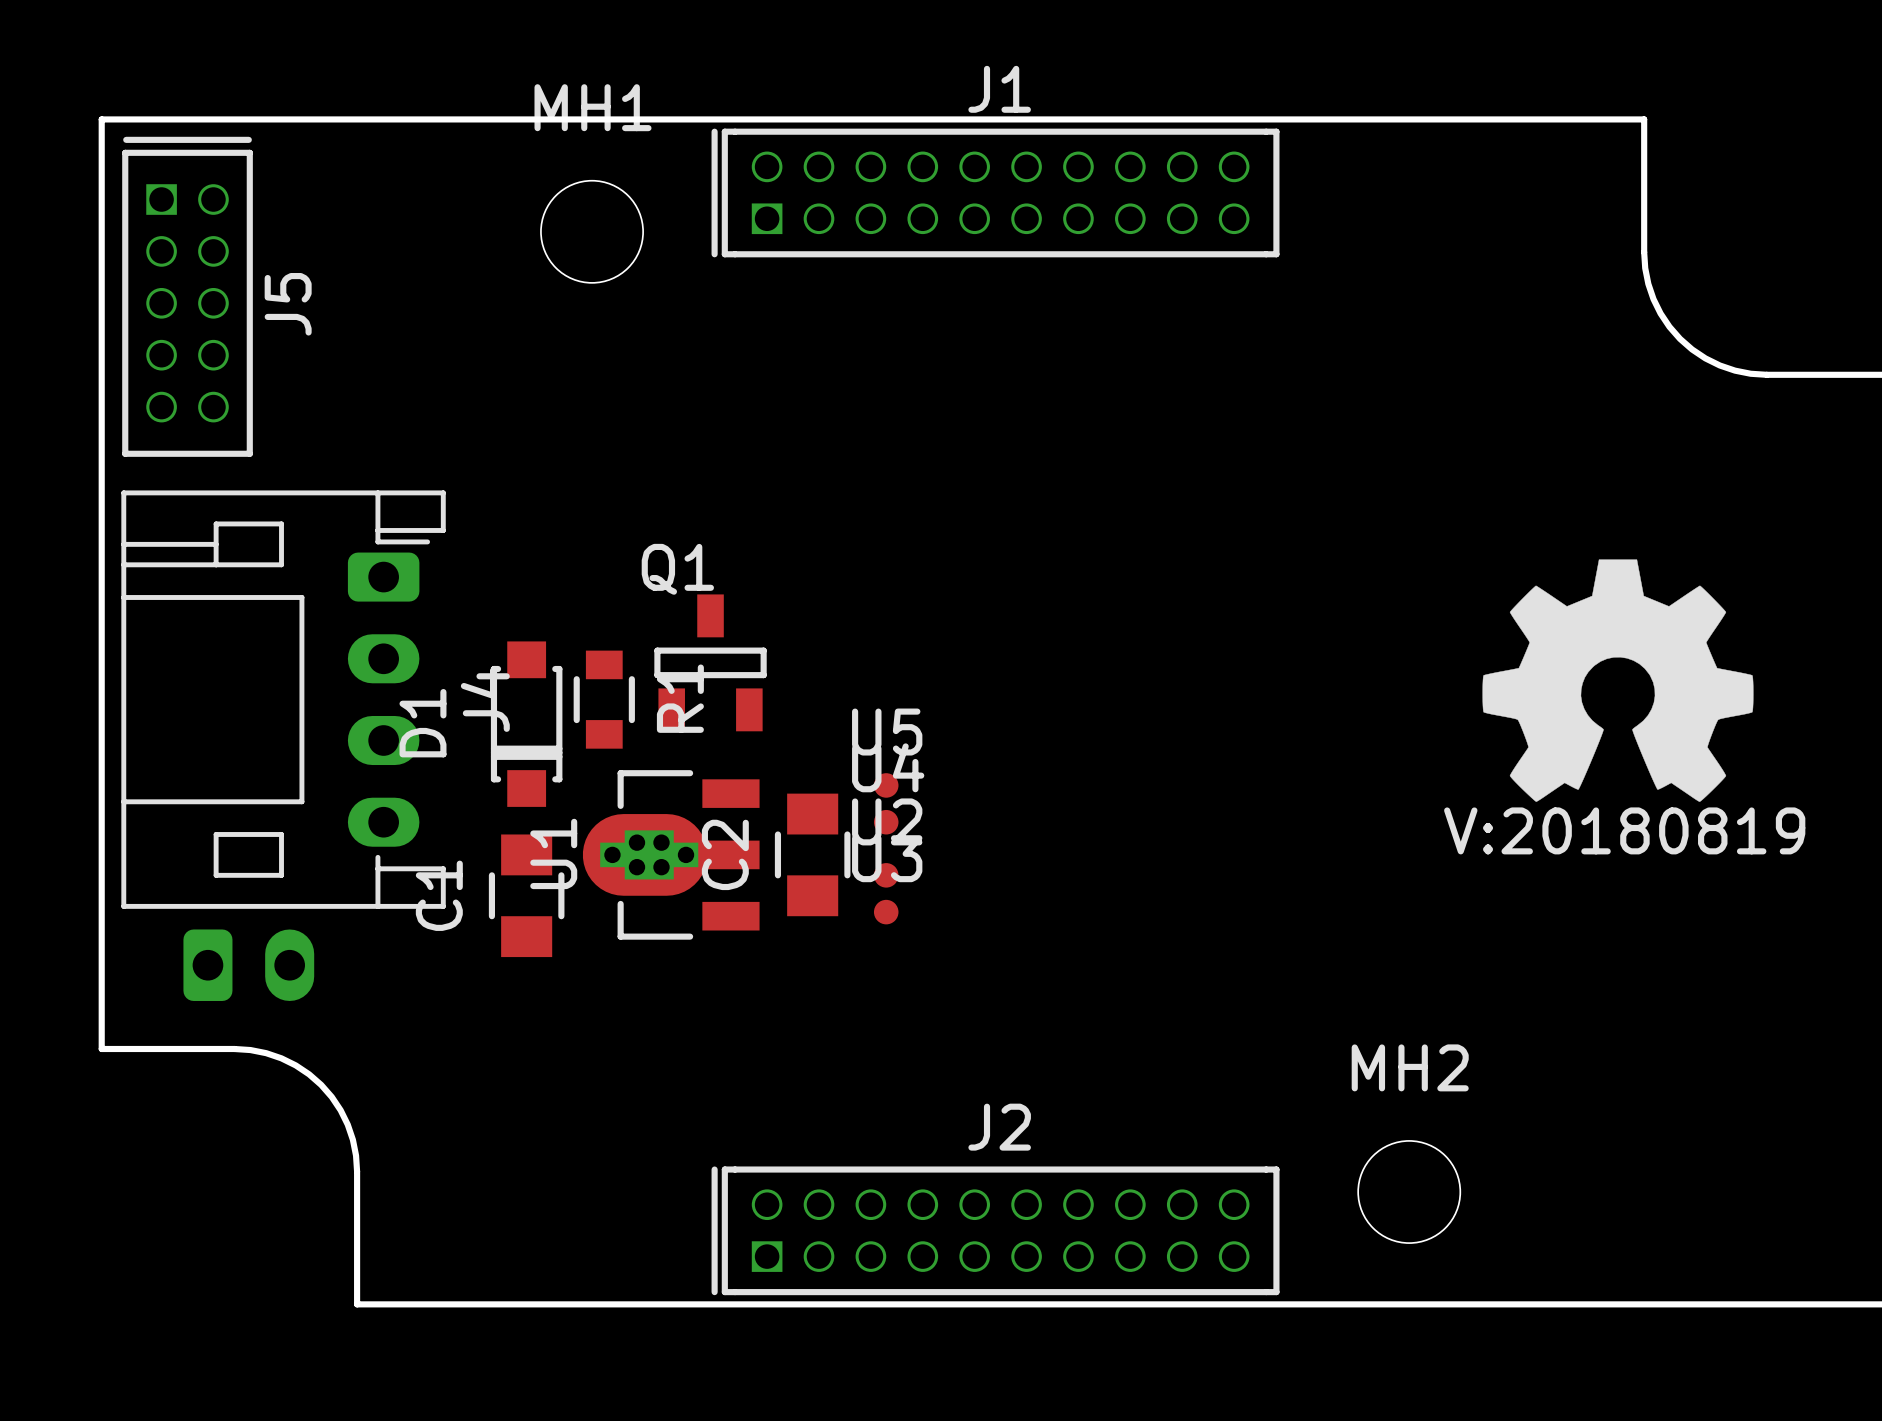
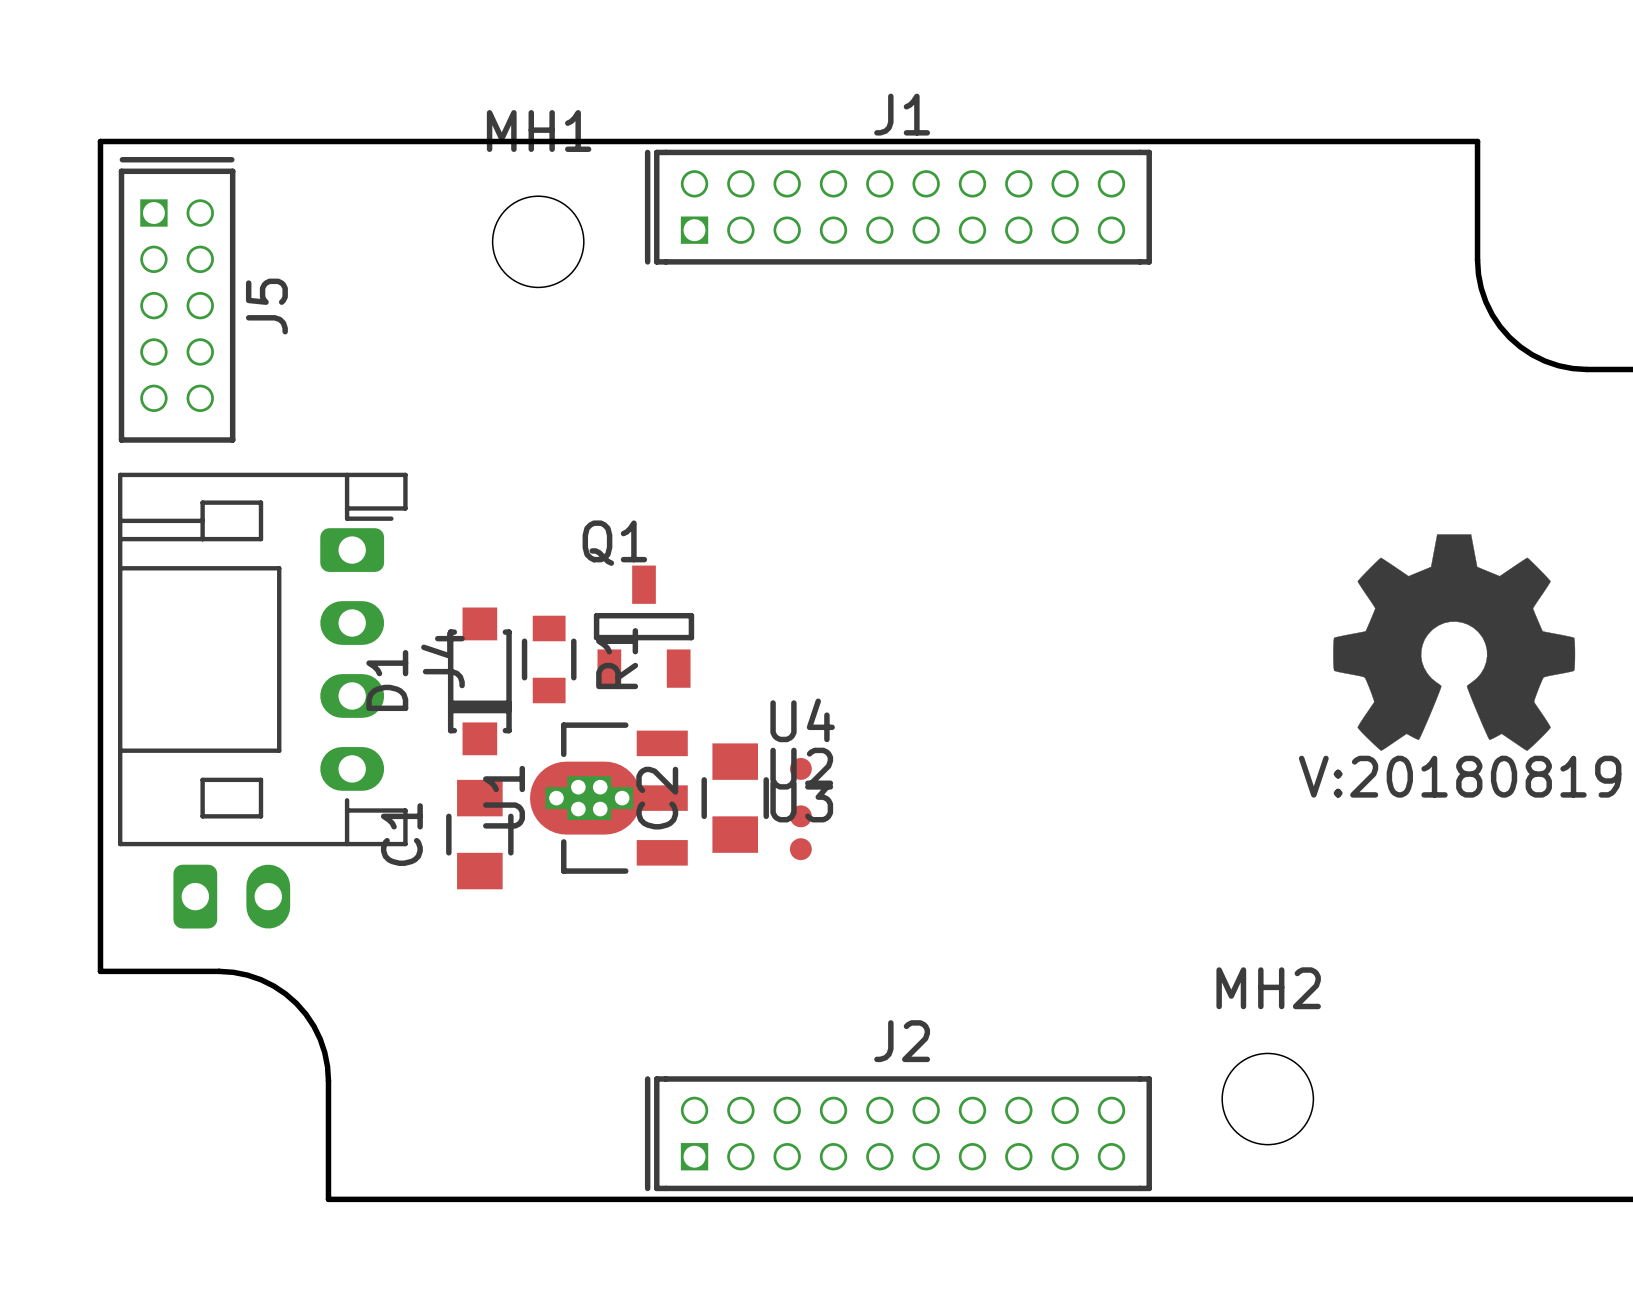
U5: (886, 785) -> none

